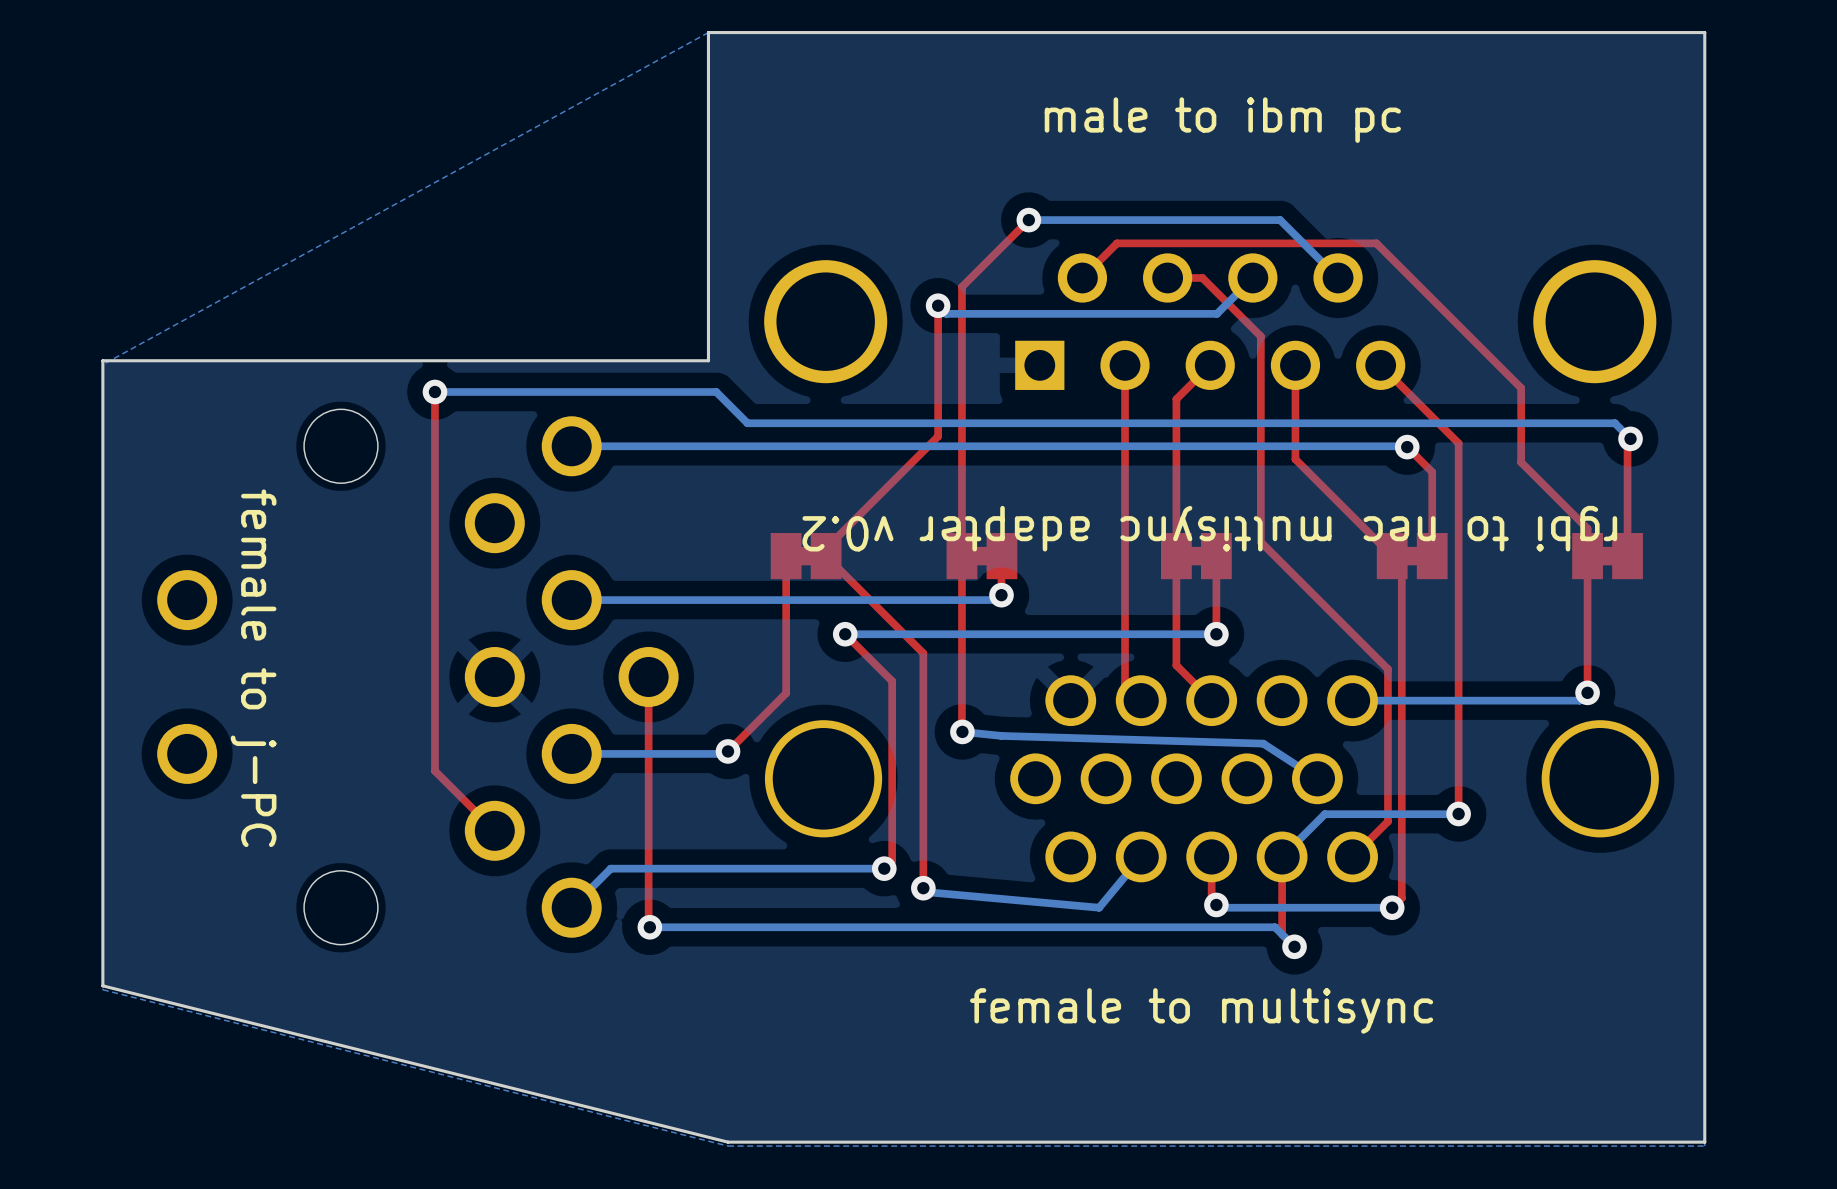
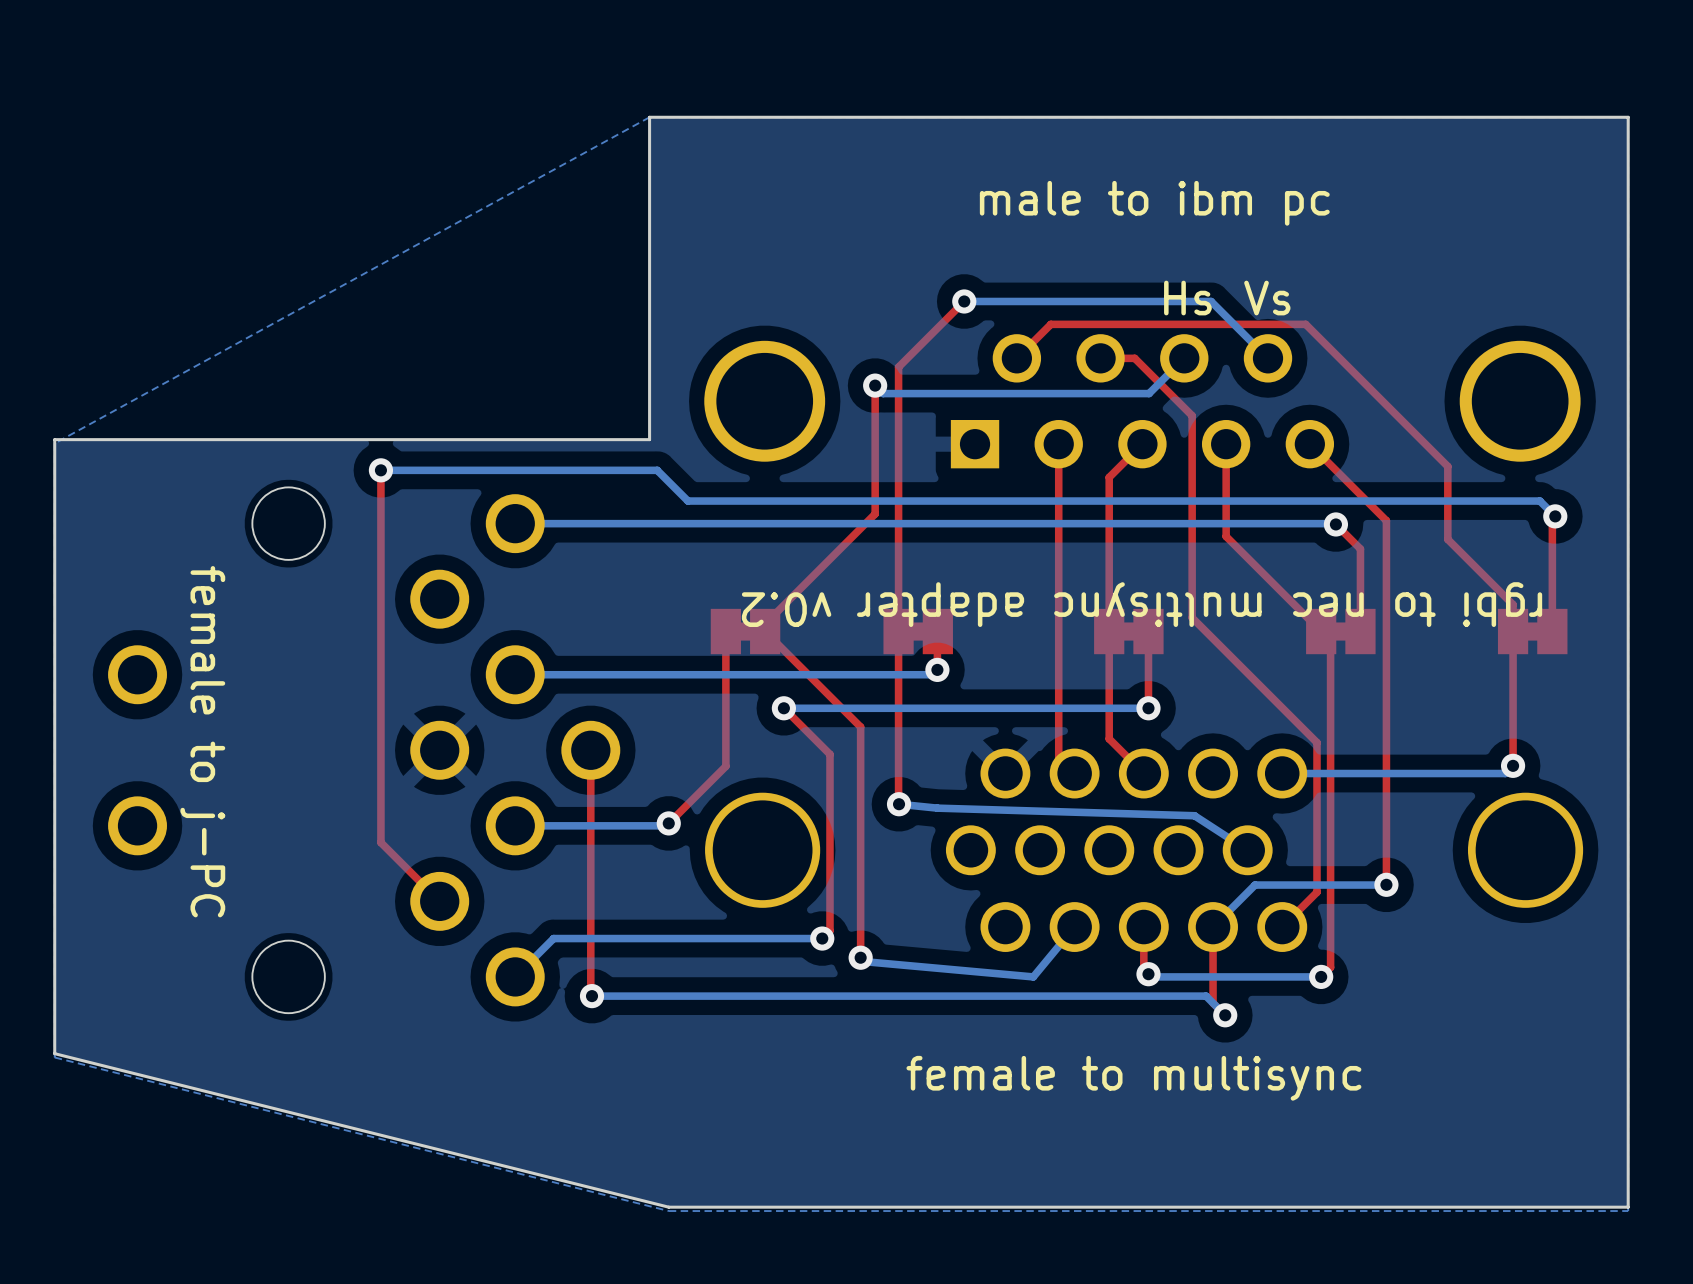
text: none -> Hs (1187, 298)
text: none -> Vs (1267, 298)

